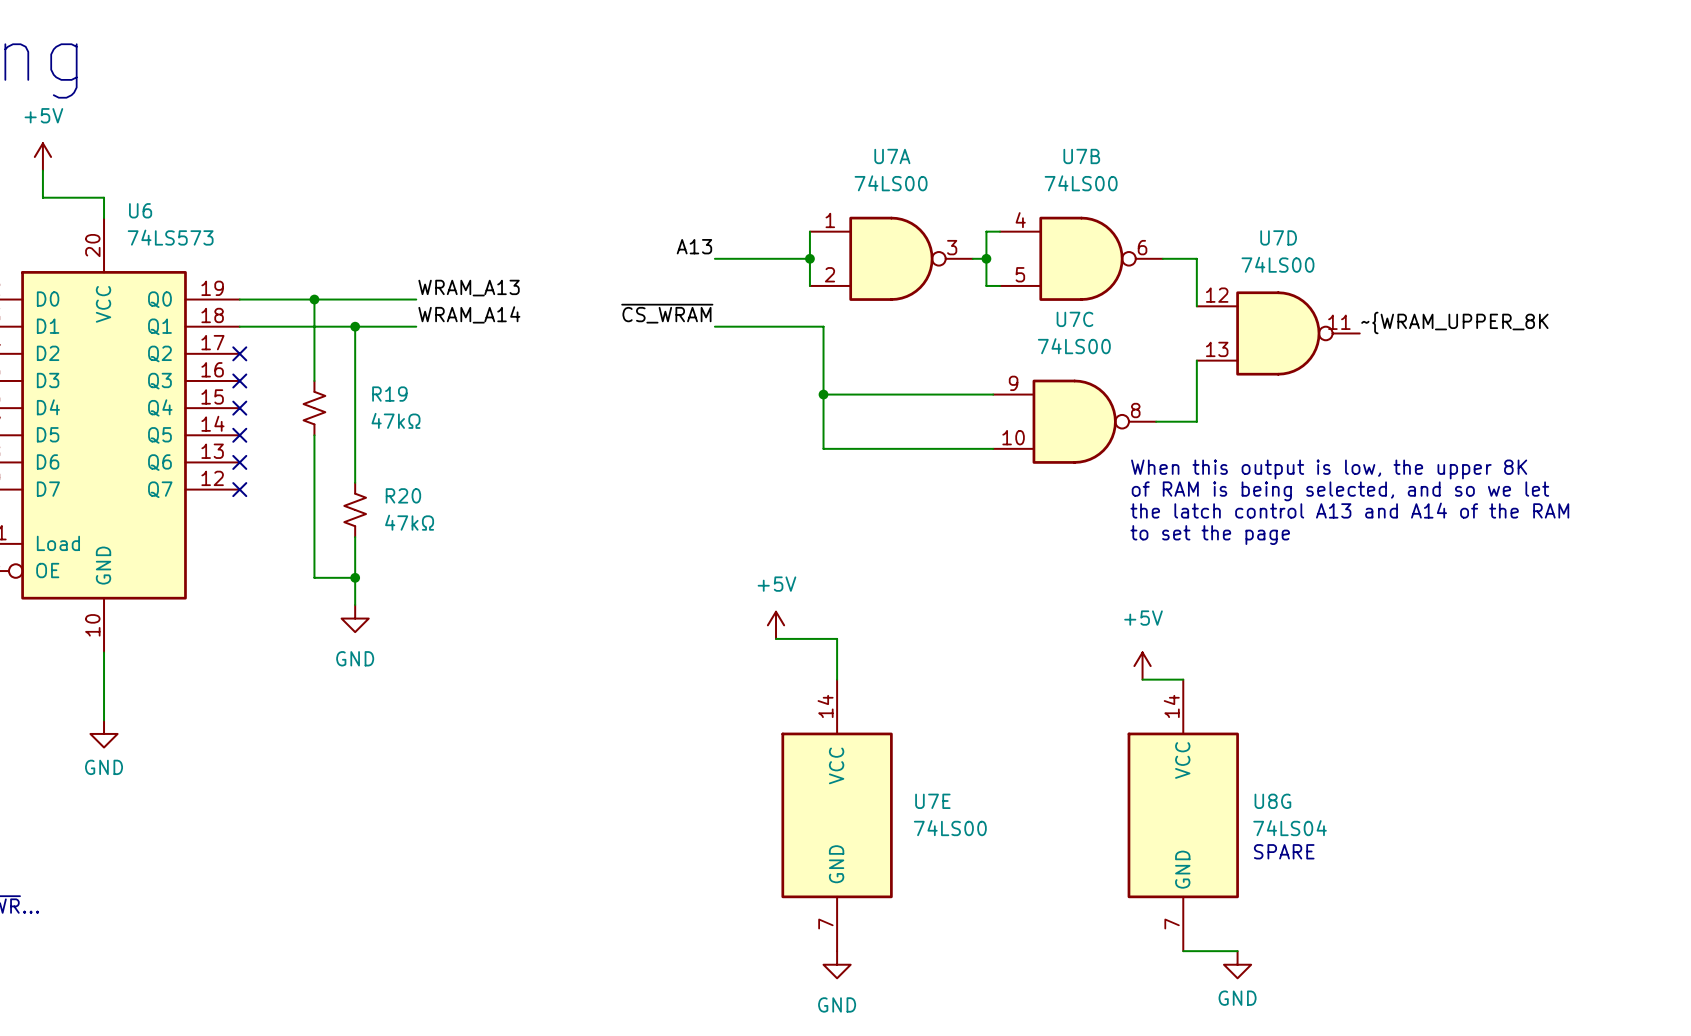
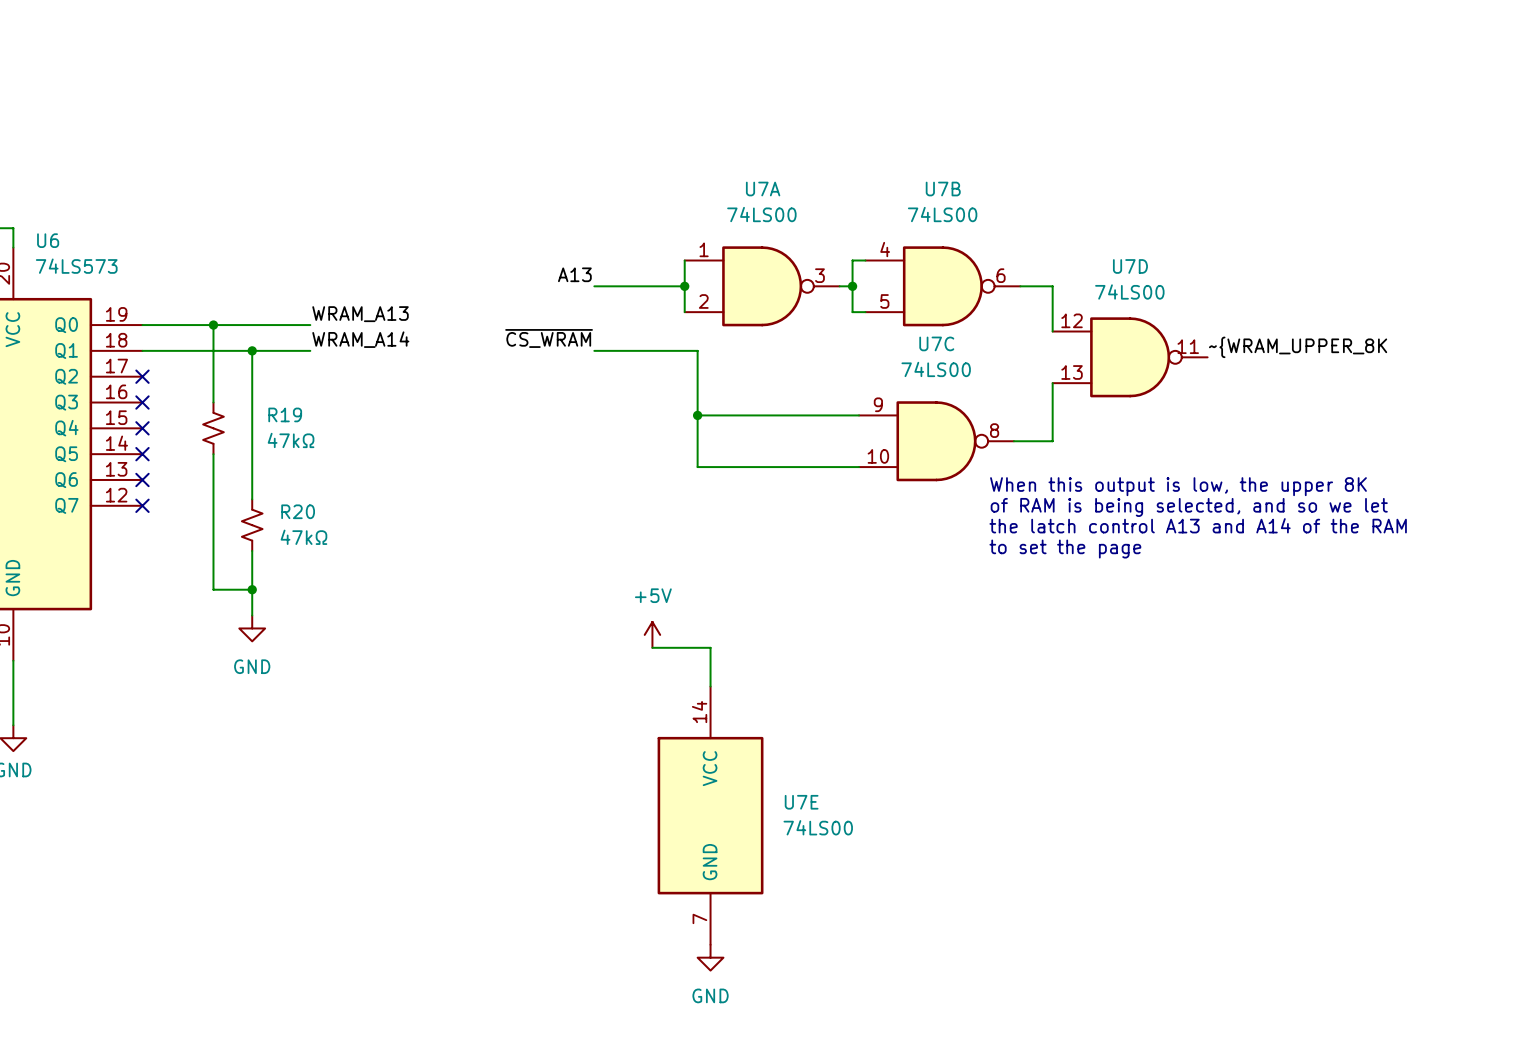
power symbol: +5V (1142, 666) -> none
wire: (1142, 679) (1183, 679) -> none
U8G: 74LS04 (1183, 815) -> none
text: SPARE (1284, 851) -> none
wire: (1183, 951) (1237, 951) -> none
power symbol: GND (1237, 964) -> none

